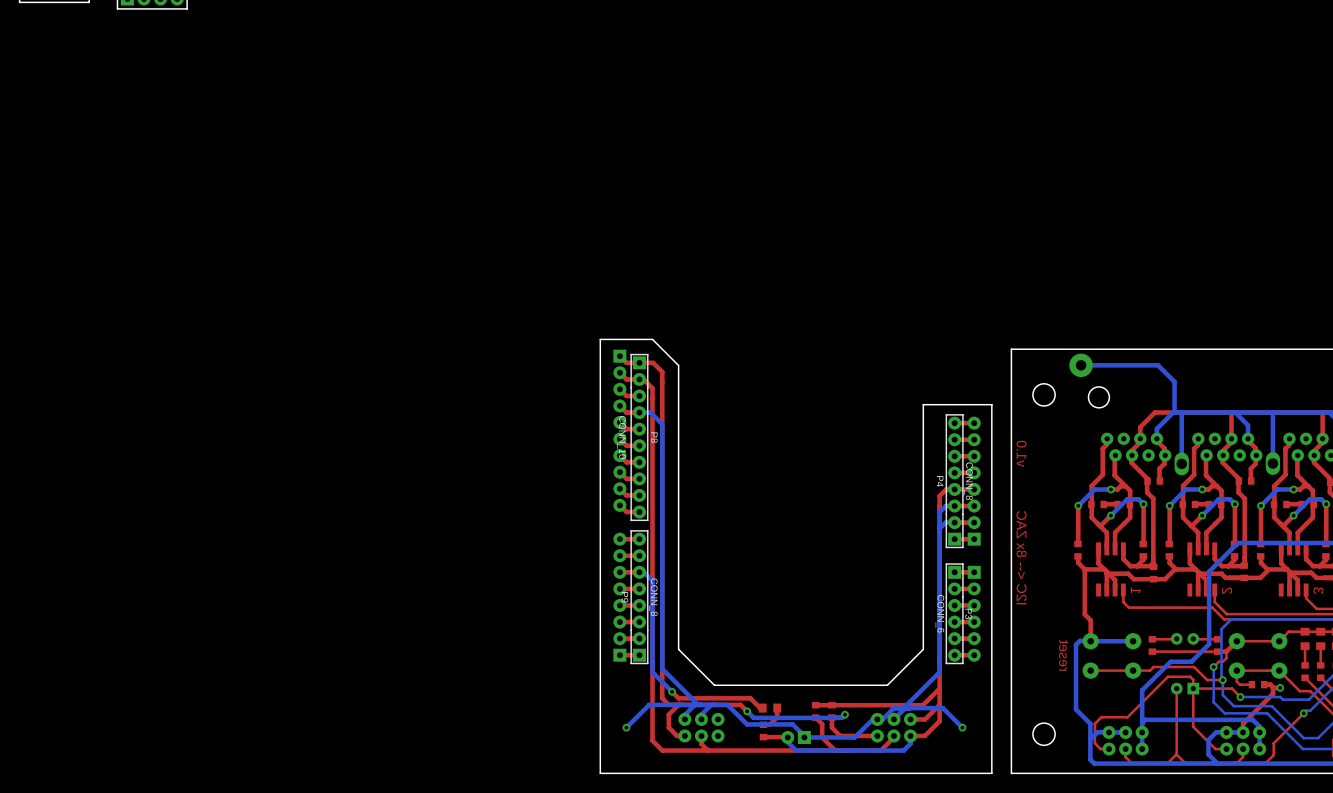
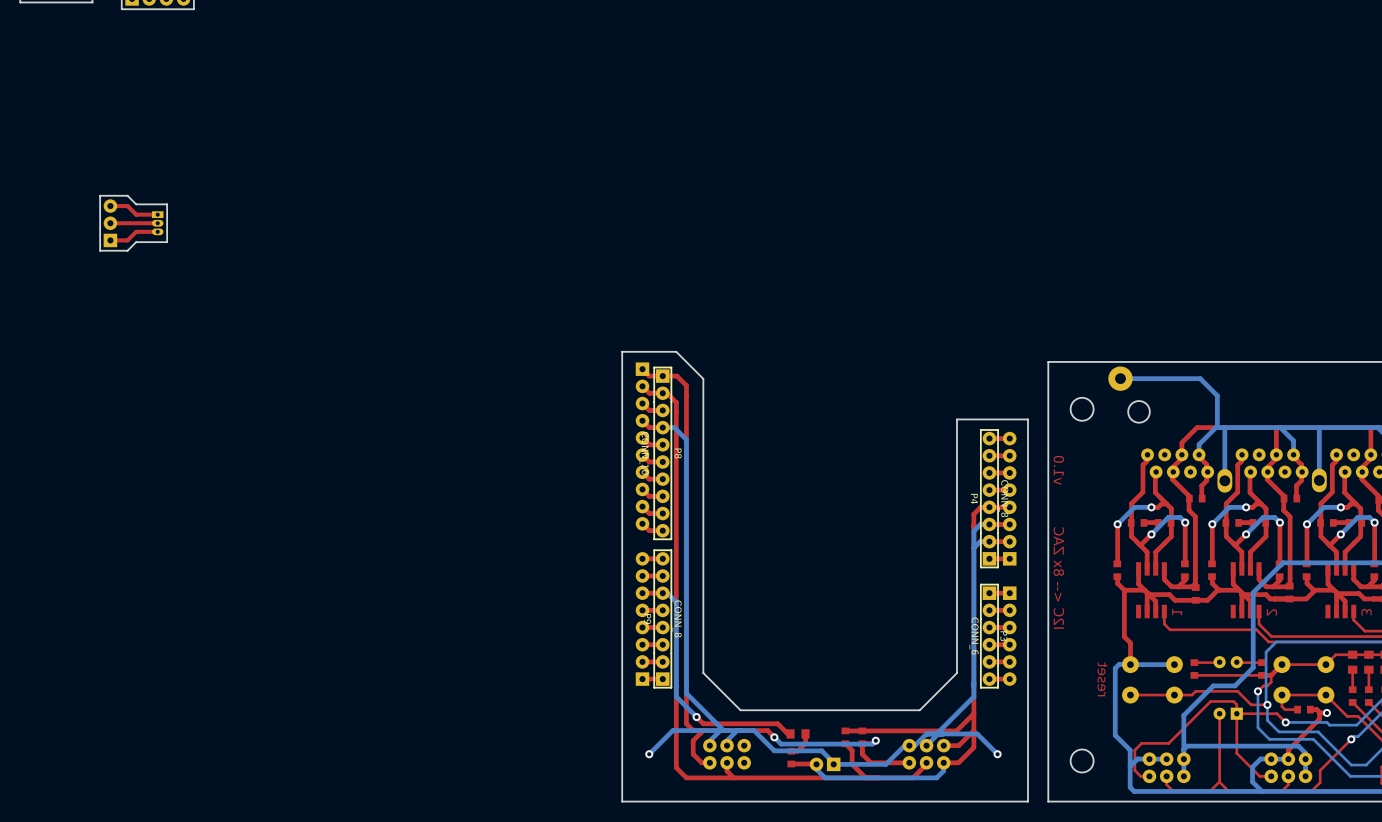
board edge: none -> (127, 195) (136, 204) (167, 204) (167, 242) (136, 242) (127, 250) (100, 250) (100, 195) (127, 195)
top track: none -> (110, 206) (127, 206) (136, 214) (157, 214)
part: none -> (110, 223)
top track: none -> (157, 223) (110, 223)
part: none -> (157, 223)
top track: none -> (157, 231) (136, 231) (127, 240) (110, 240)

